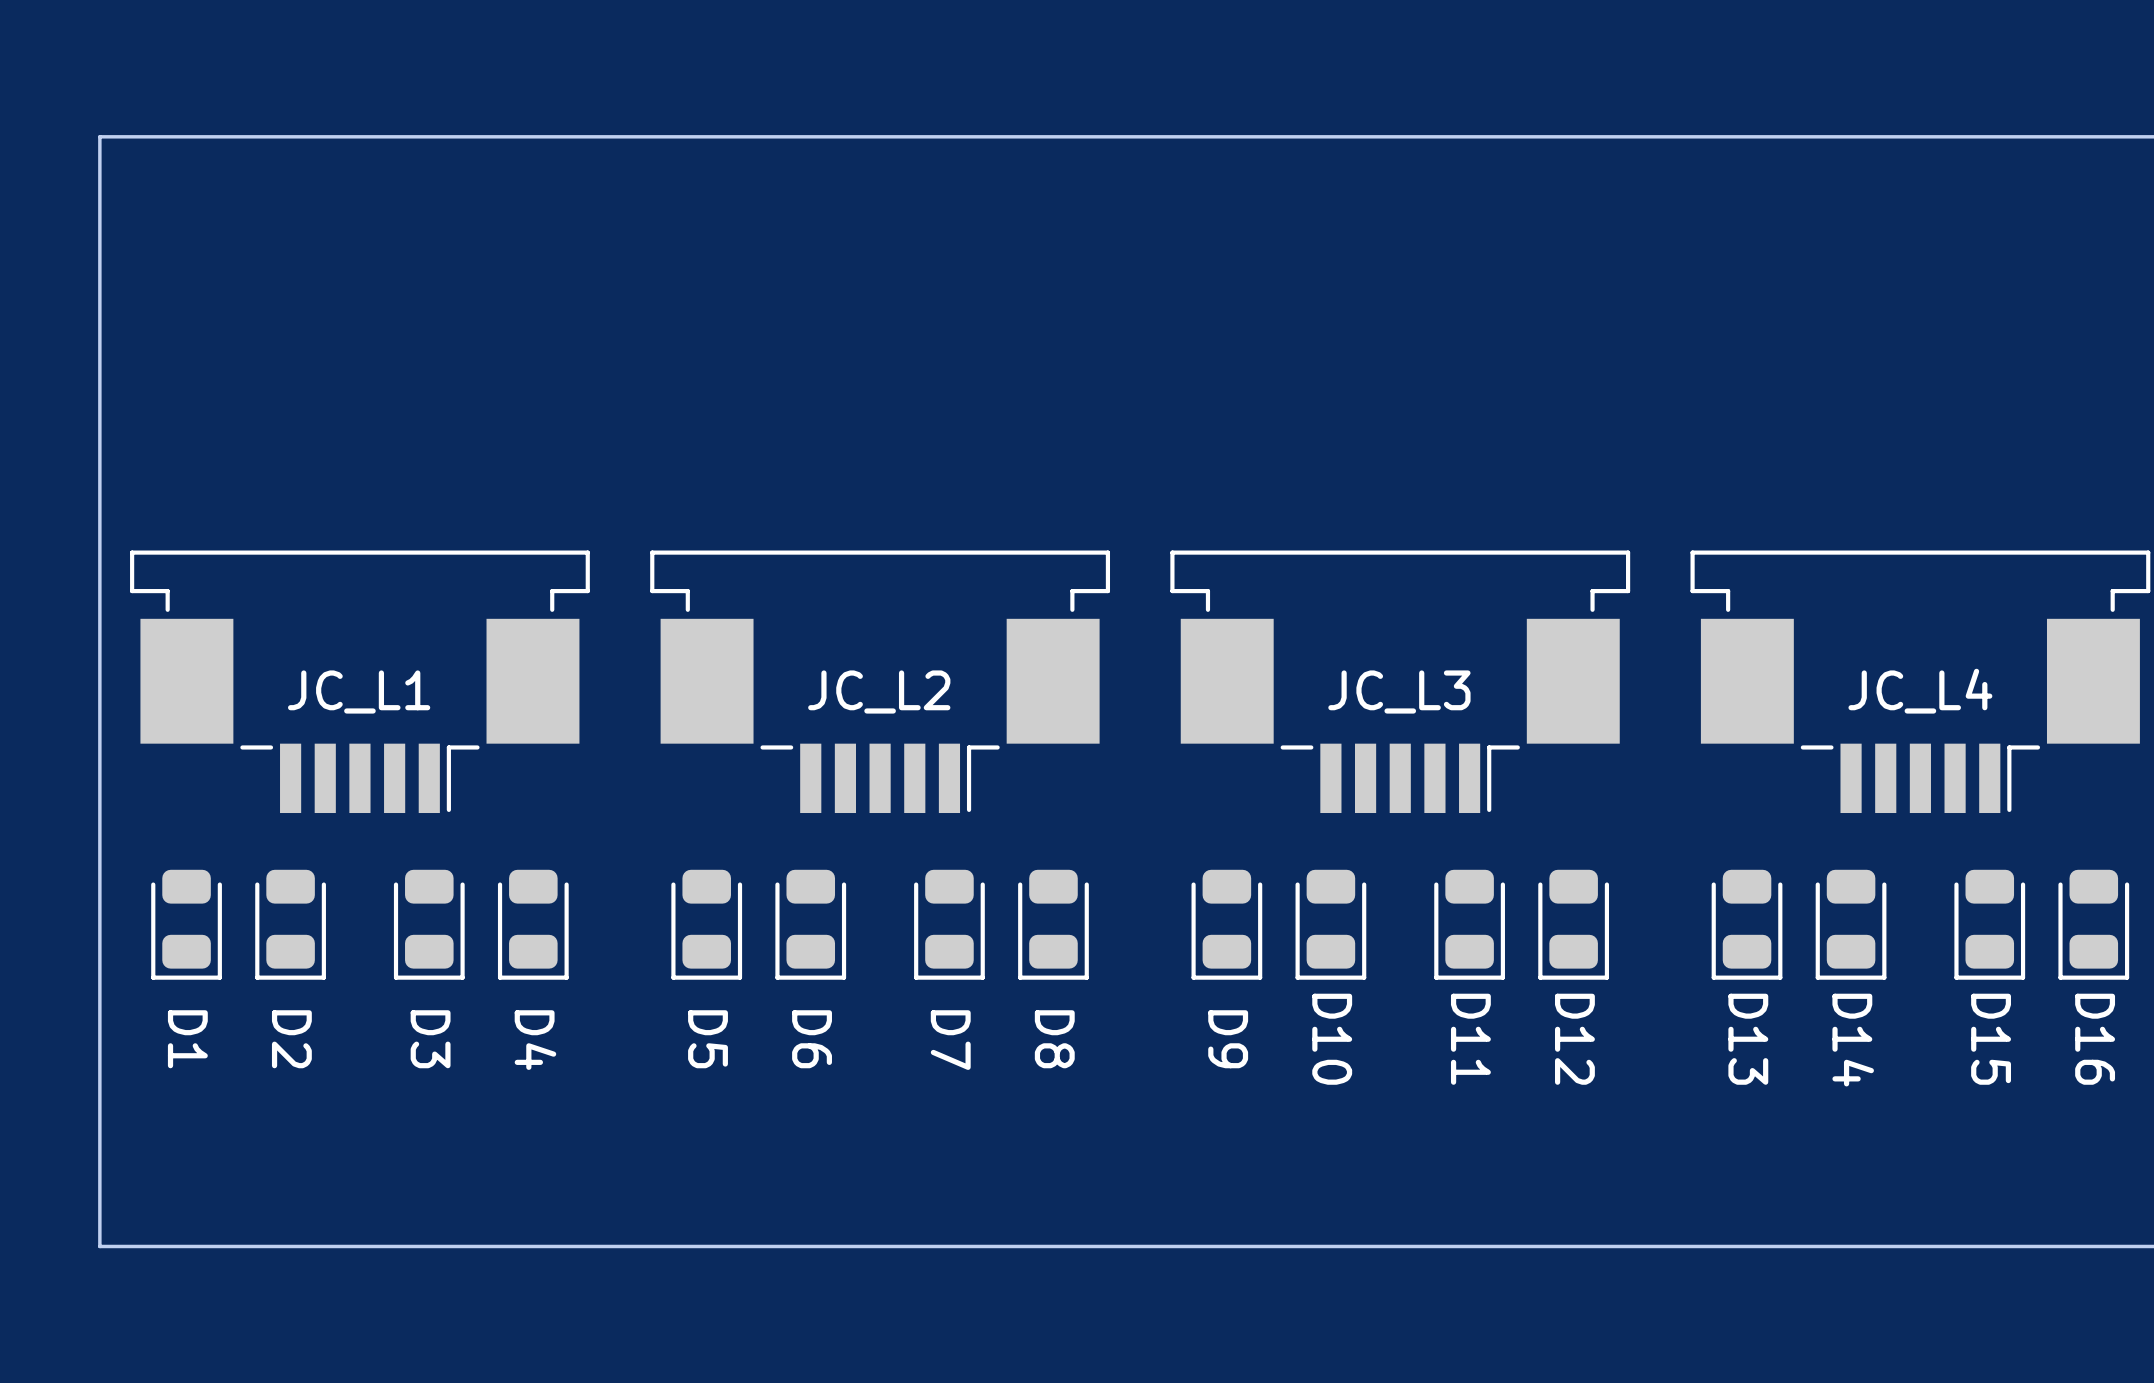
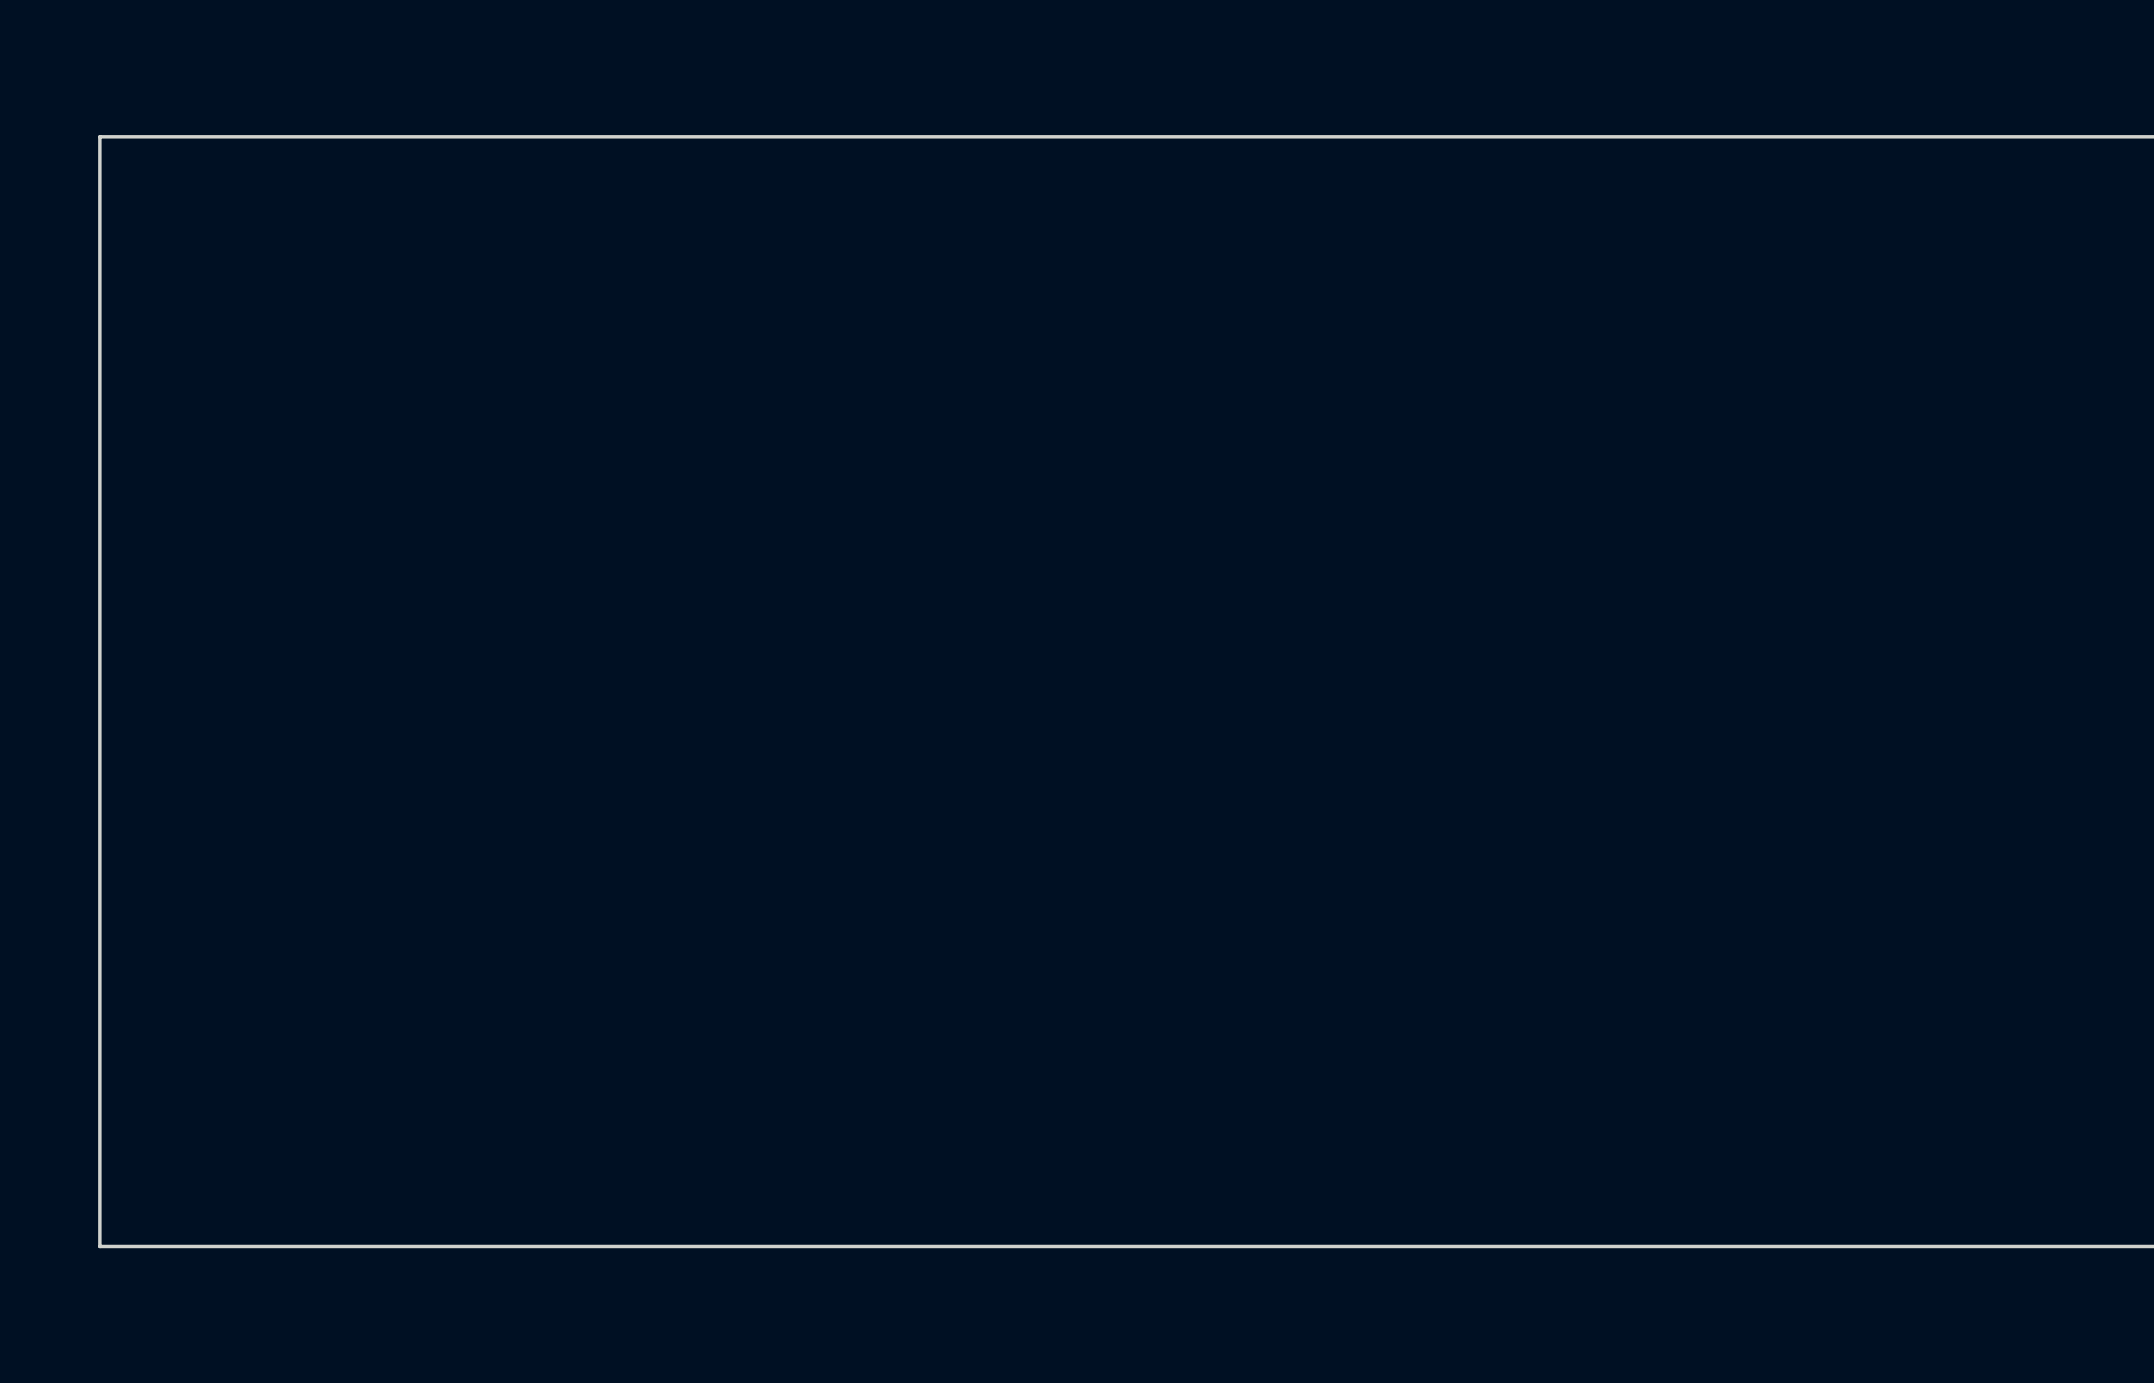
JC_L1: (359, 681) -> none
JC_L2: (880, 681) -> none
JC_L3: (1400, 681) -> none
JC_L4: (1920, 681) -> none
D1: (186, 924) -> none
D2: (290, 924) -> none
D3: (429, 924) -> none
D4: (533, 924) -> none
D5: (706, 924) -> none
D6: (810, 924) -> none
D7: (949, 924) -> none
D8: (1053, 924) -> none
D9: (1226, 924) -> none
D10: (1330, 924) -> none
D11: (1469, 924) -> none
D12: (1573, 924) -> none
D13: (1747, 924) -> none
D14: (1851, 924) -> none
D15: (1989, 924) -> none
D16: (2093, 924) -> none

